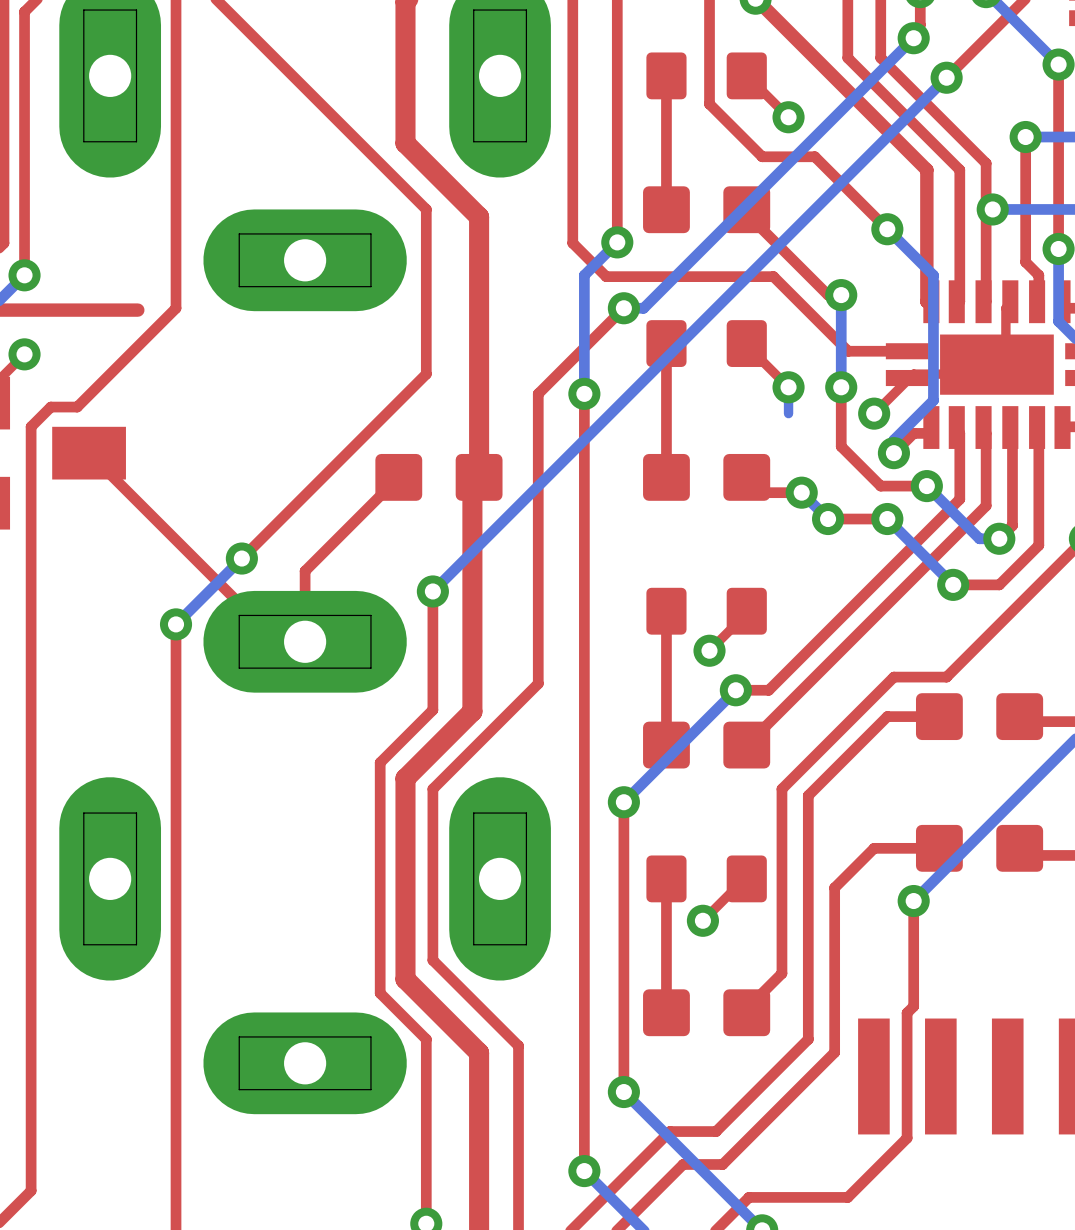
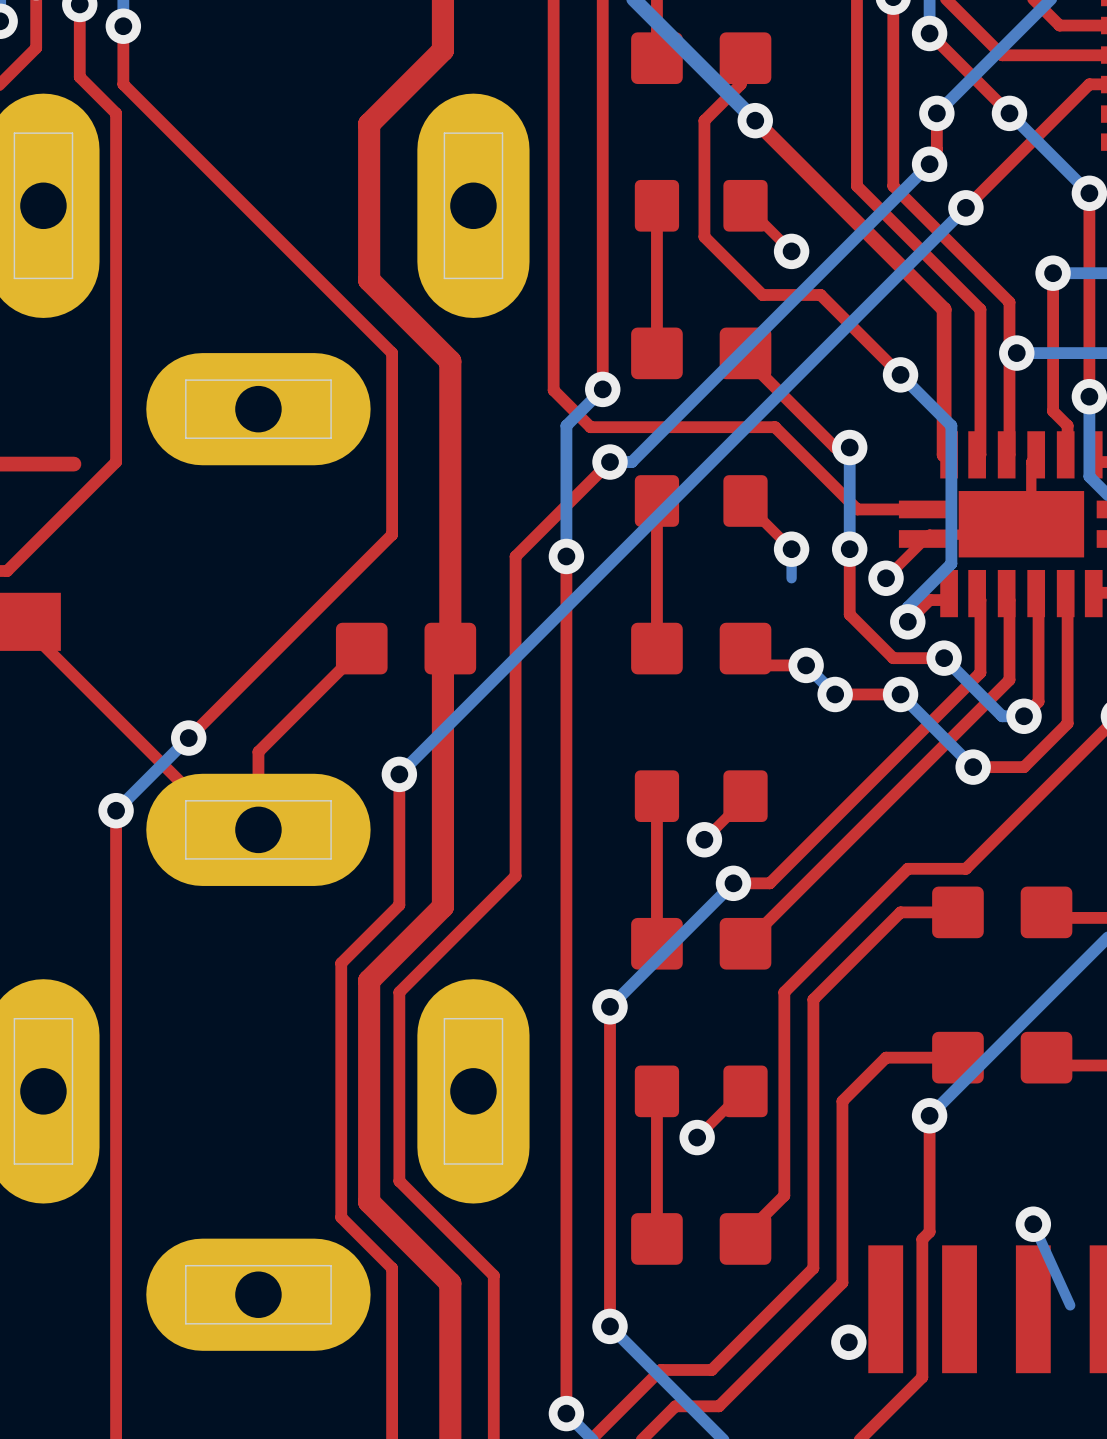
bottom track: none -> (1033, 1224) (1070, 1305)
via: none -> (1033, 1224)
via: none -> (848, 1342)

